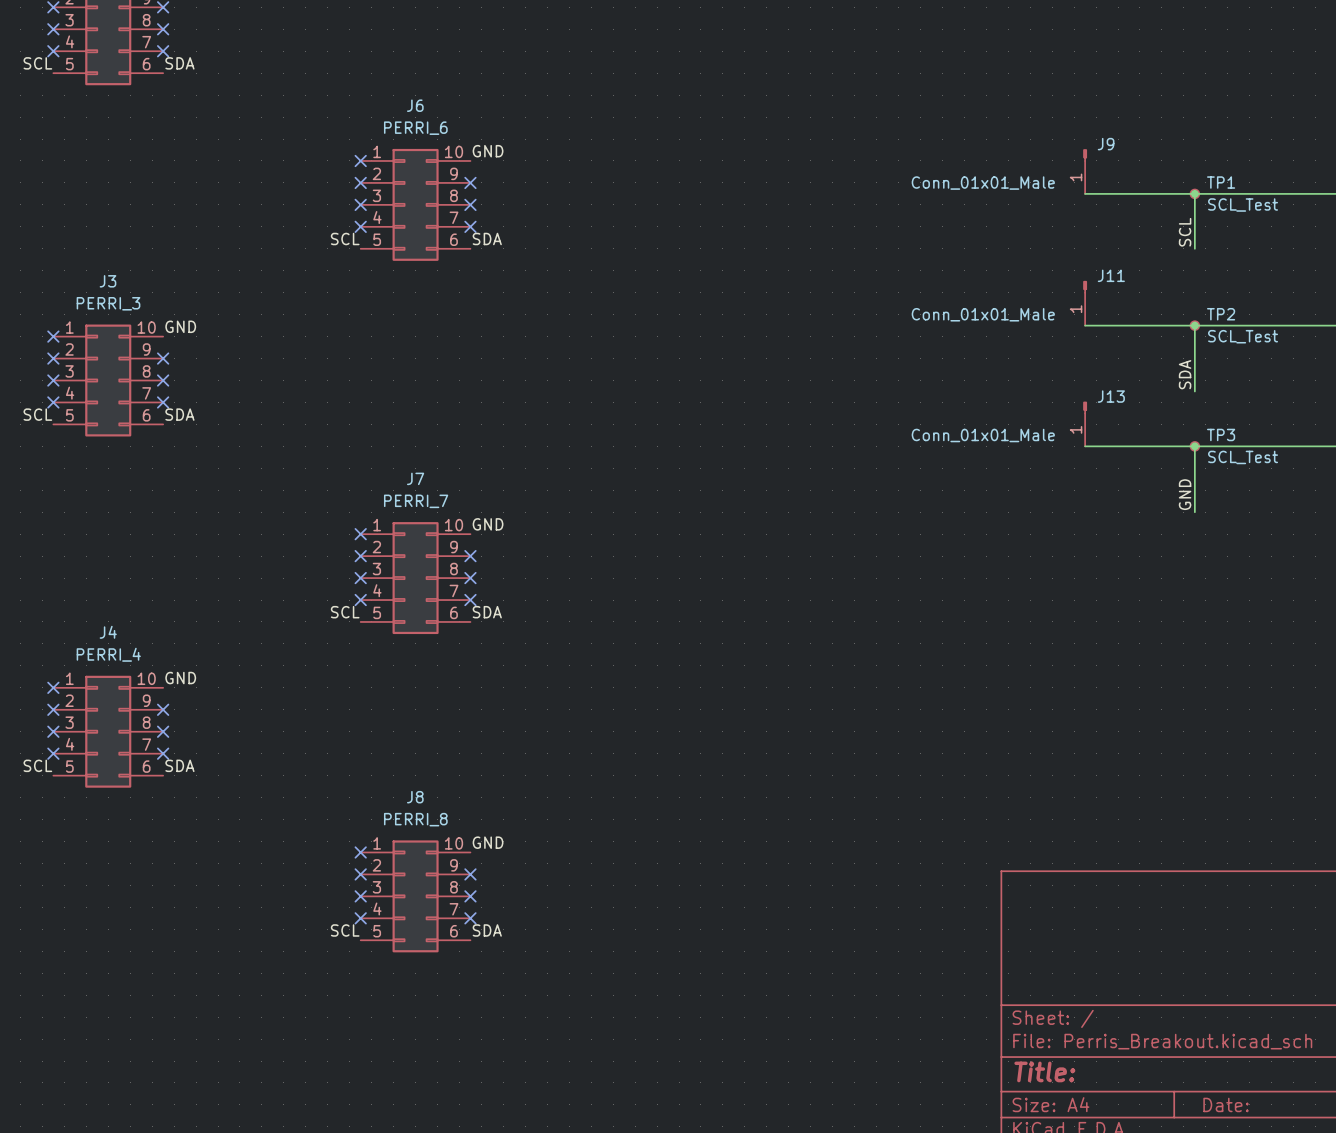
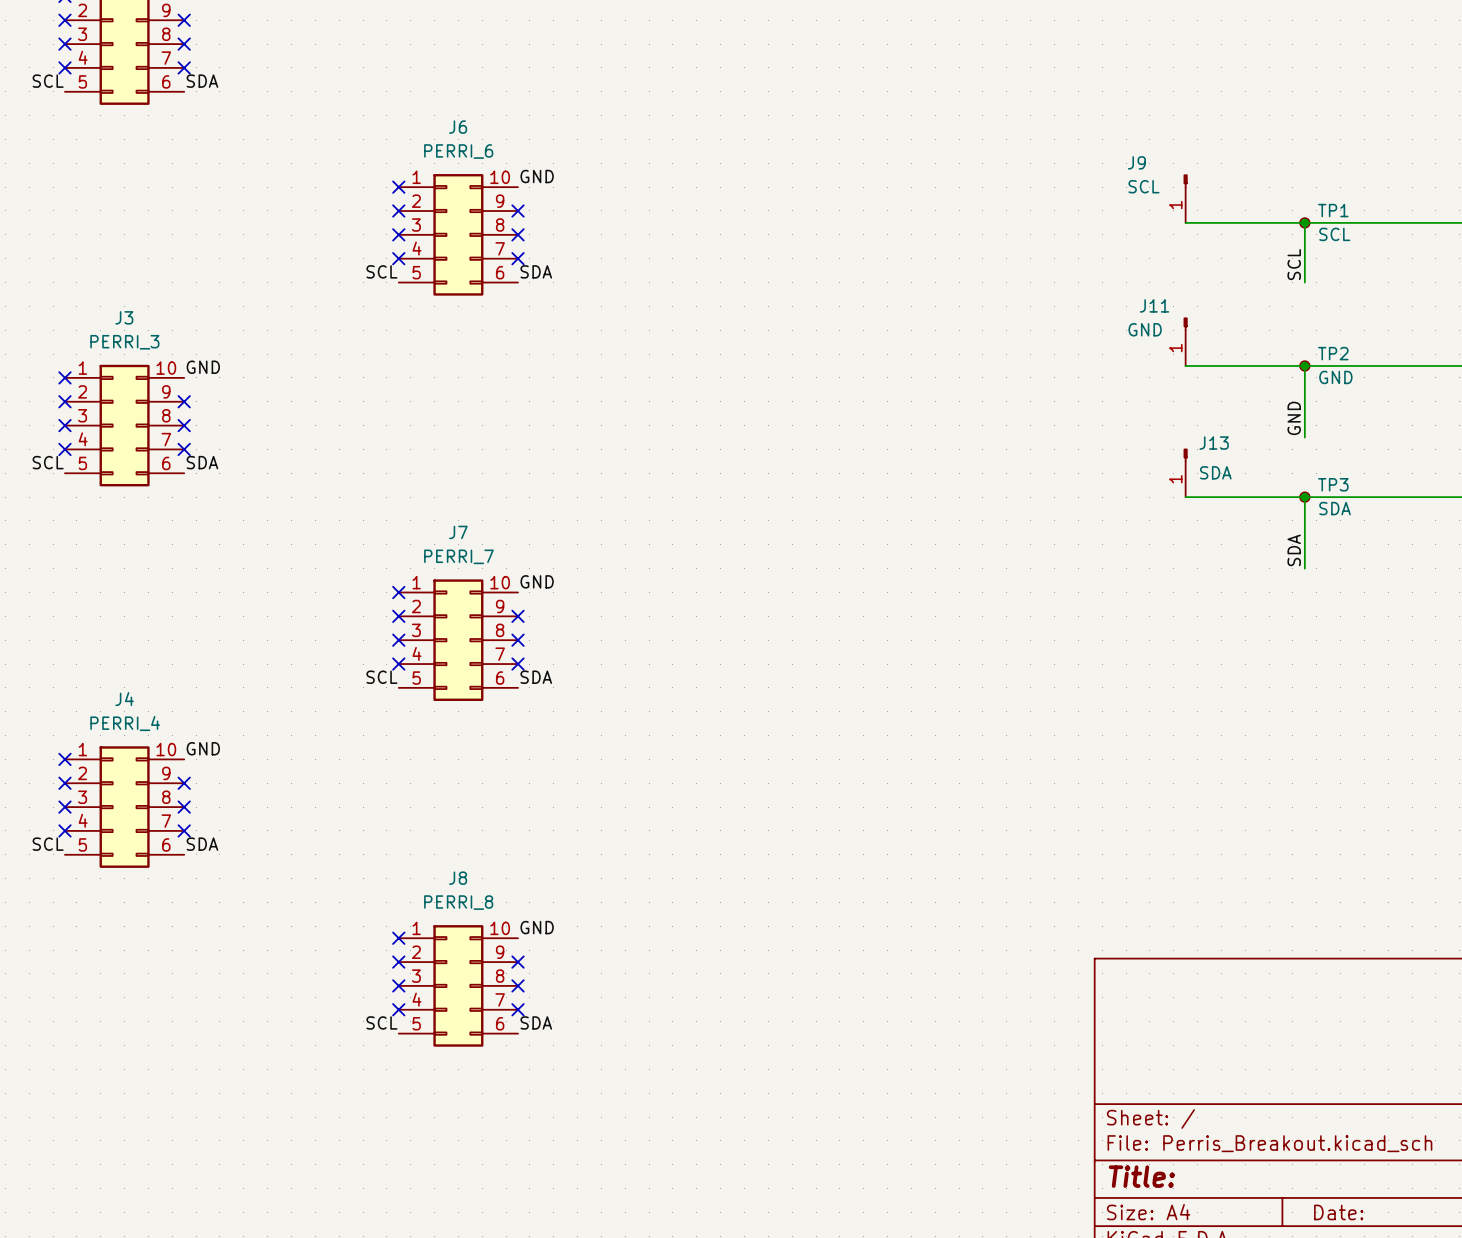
J9 name position: J9 (1106, 144) -> J9 (1136, 162)
J9 value: Conn_01x01_Male (983, 183) -> SCL (1143, 186)
TP1 value: SCL_Test (1243, 205) -> SCL (1334, 234)
J11 name position: J11 (1111, 275) -> J11 (1154, 305)
J11 value: Conn_01x01_Male (983, 314) -> GND (1145, 329)
TP2 value: SCL_Test (1243, 336) -> GND (1335, 377)
label: SDA (1185, 374) -> GND (1294, 418)
J13 value: Conn_01x01_Male (983, 435) -> SDA (1215, 472)
TP3 value: SCL_Test (1243, 457) -> SDA (1335, 508)
label: GND (1185, 494) -> SDA (1294, 550)

